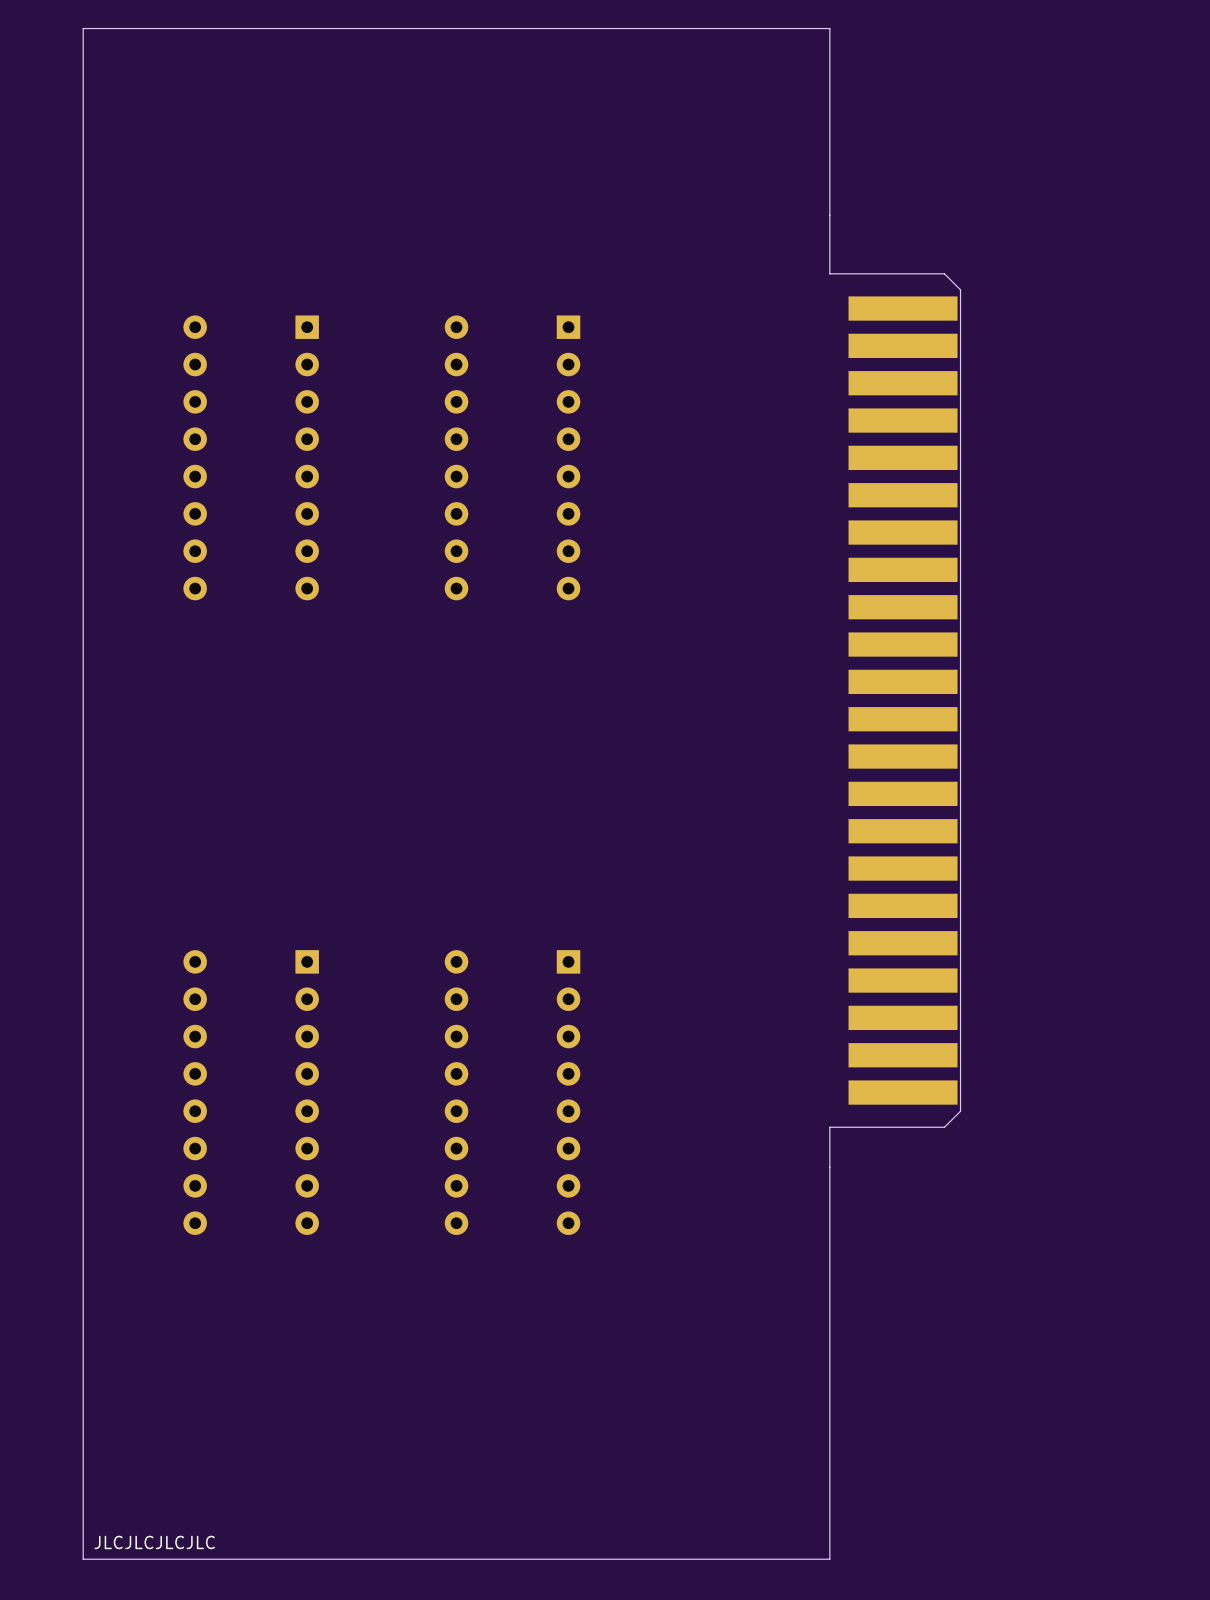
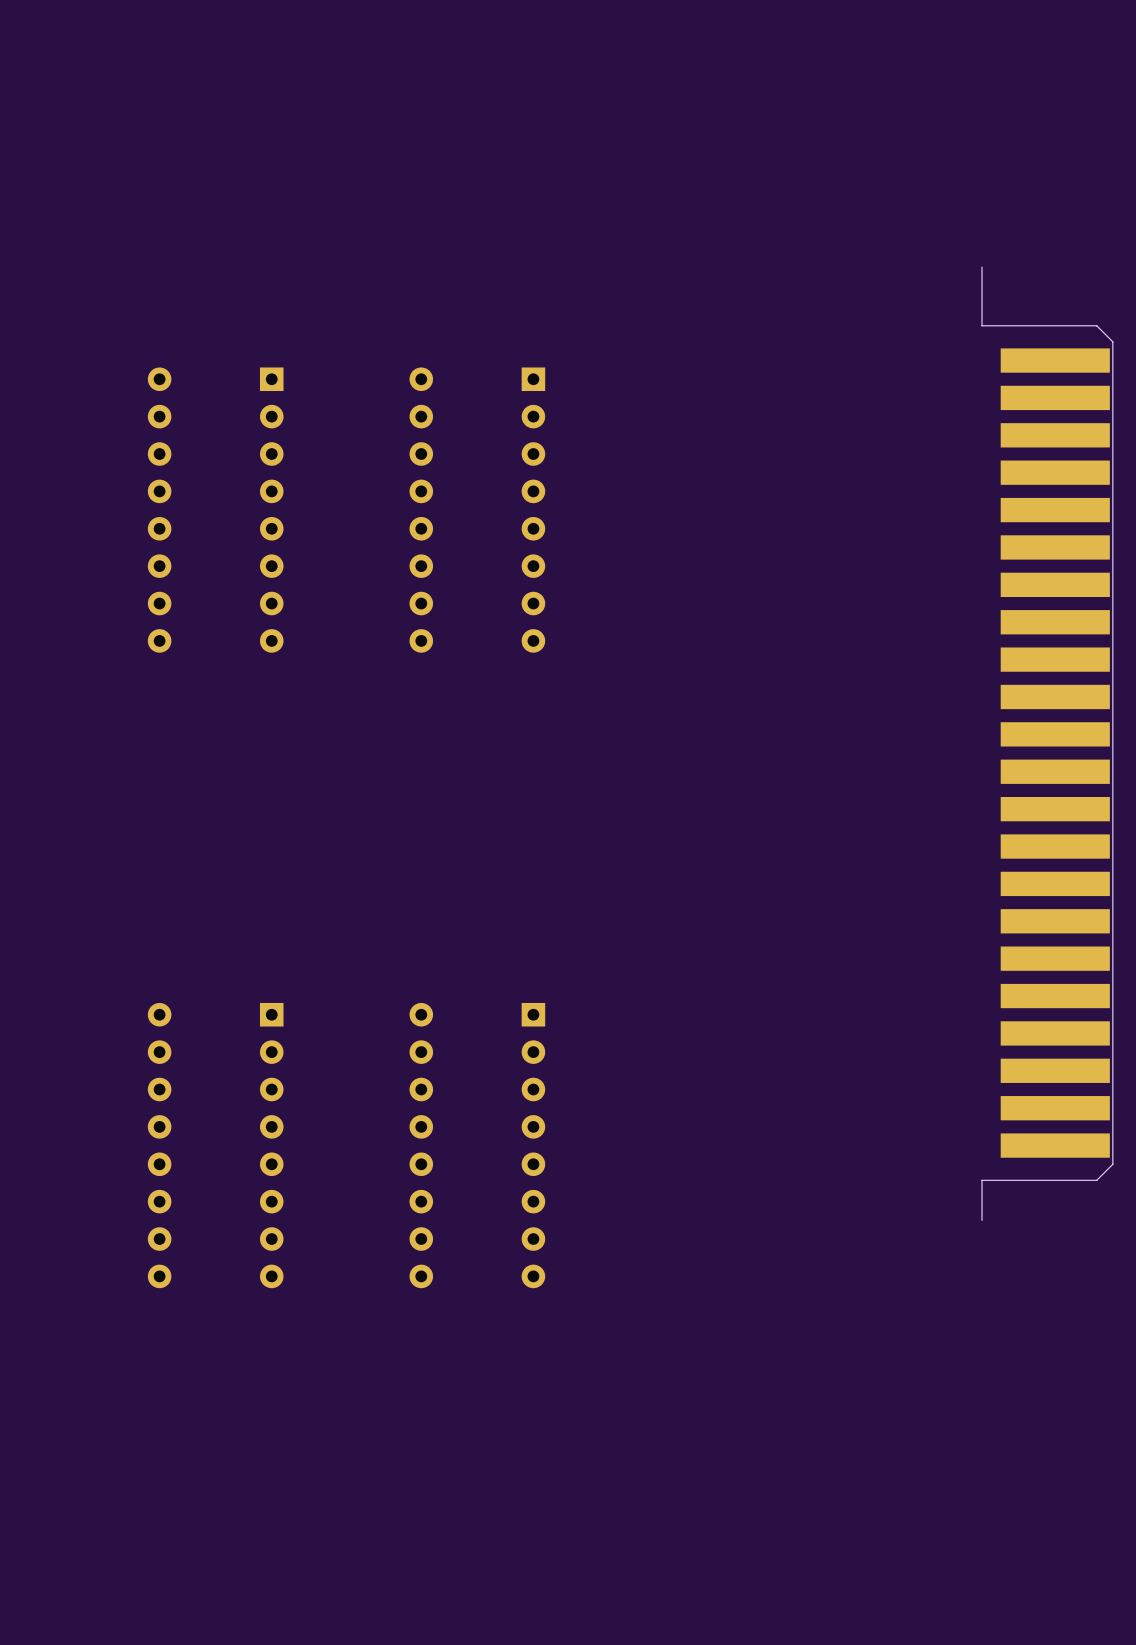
board edge: (829, 215) (829, 28) (83, 28) (83, 1559) (829, 1559) (829, 1167) -> none
part position: (895, 691) -> (1047, 743)
text: JLCJLCJLCJLC (154, 1542) -> none

